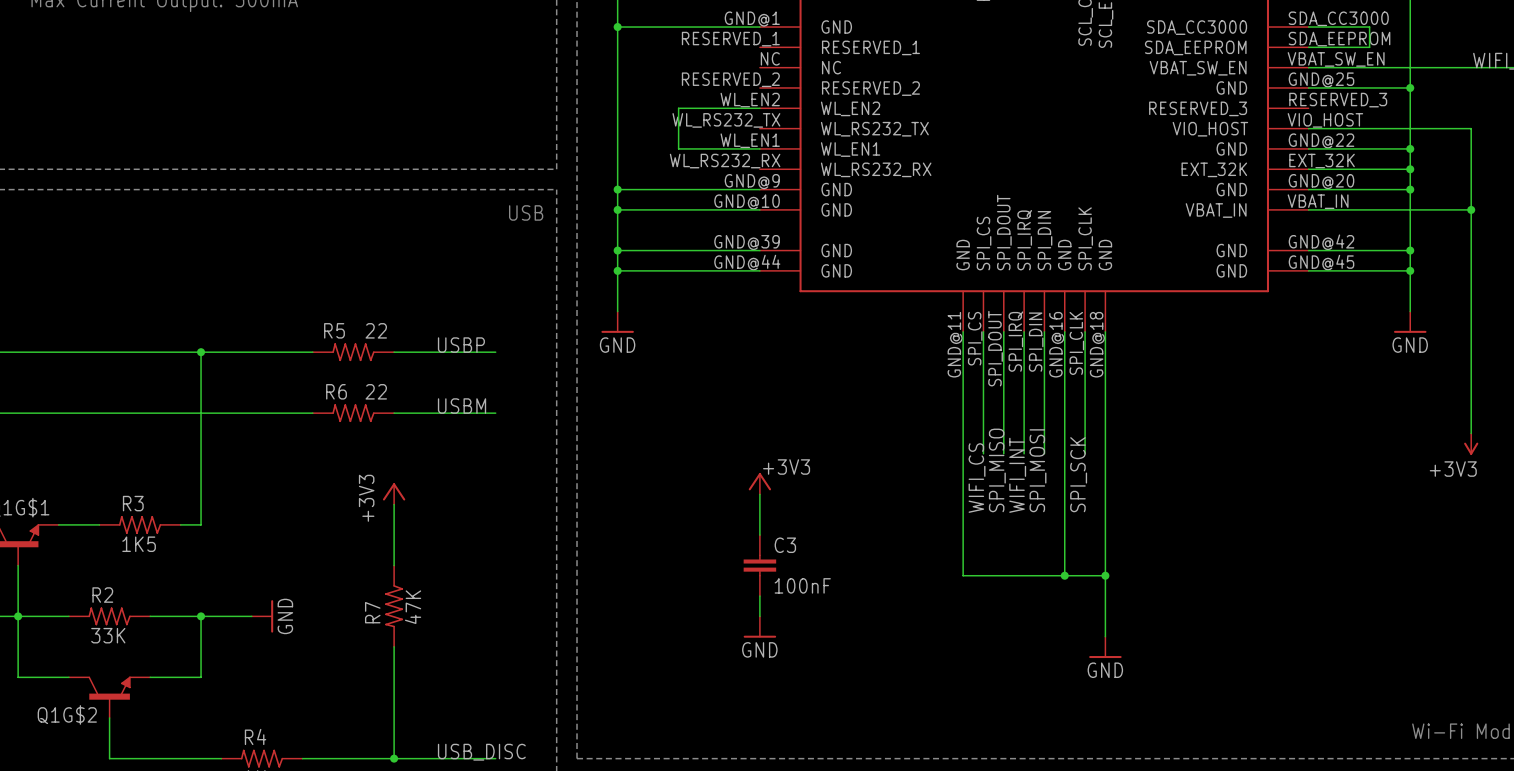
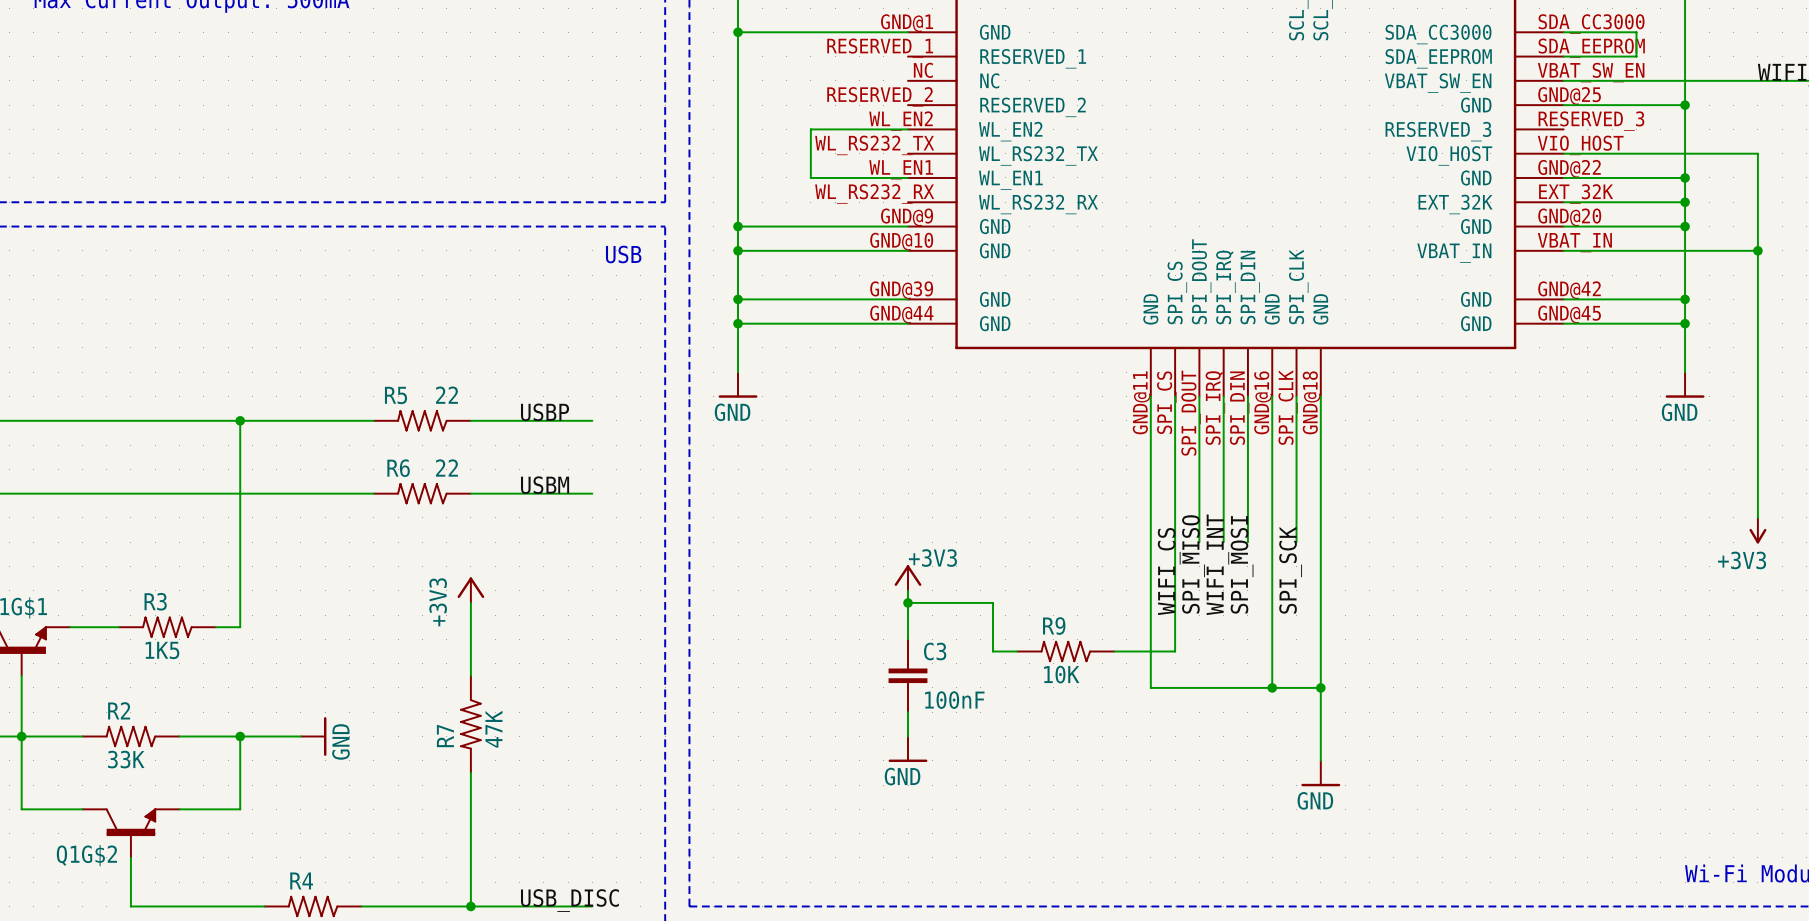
wire: none -> (1175, 542) (1175, 651) (1114, 651)
wire: none -> (908, 602) (992, 602) (992, 651) (1017, 651)
junction: none -> (908, 602)
R9: none -> 10K (1065, 651)

